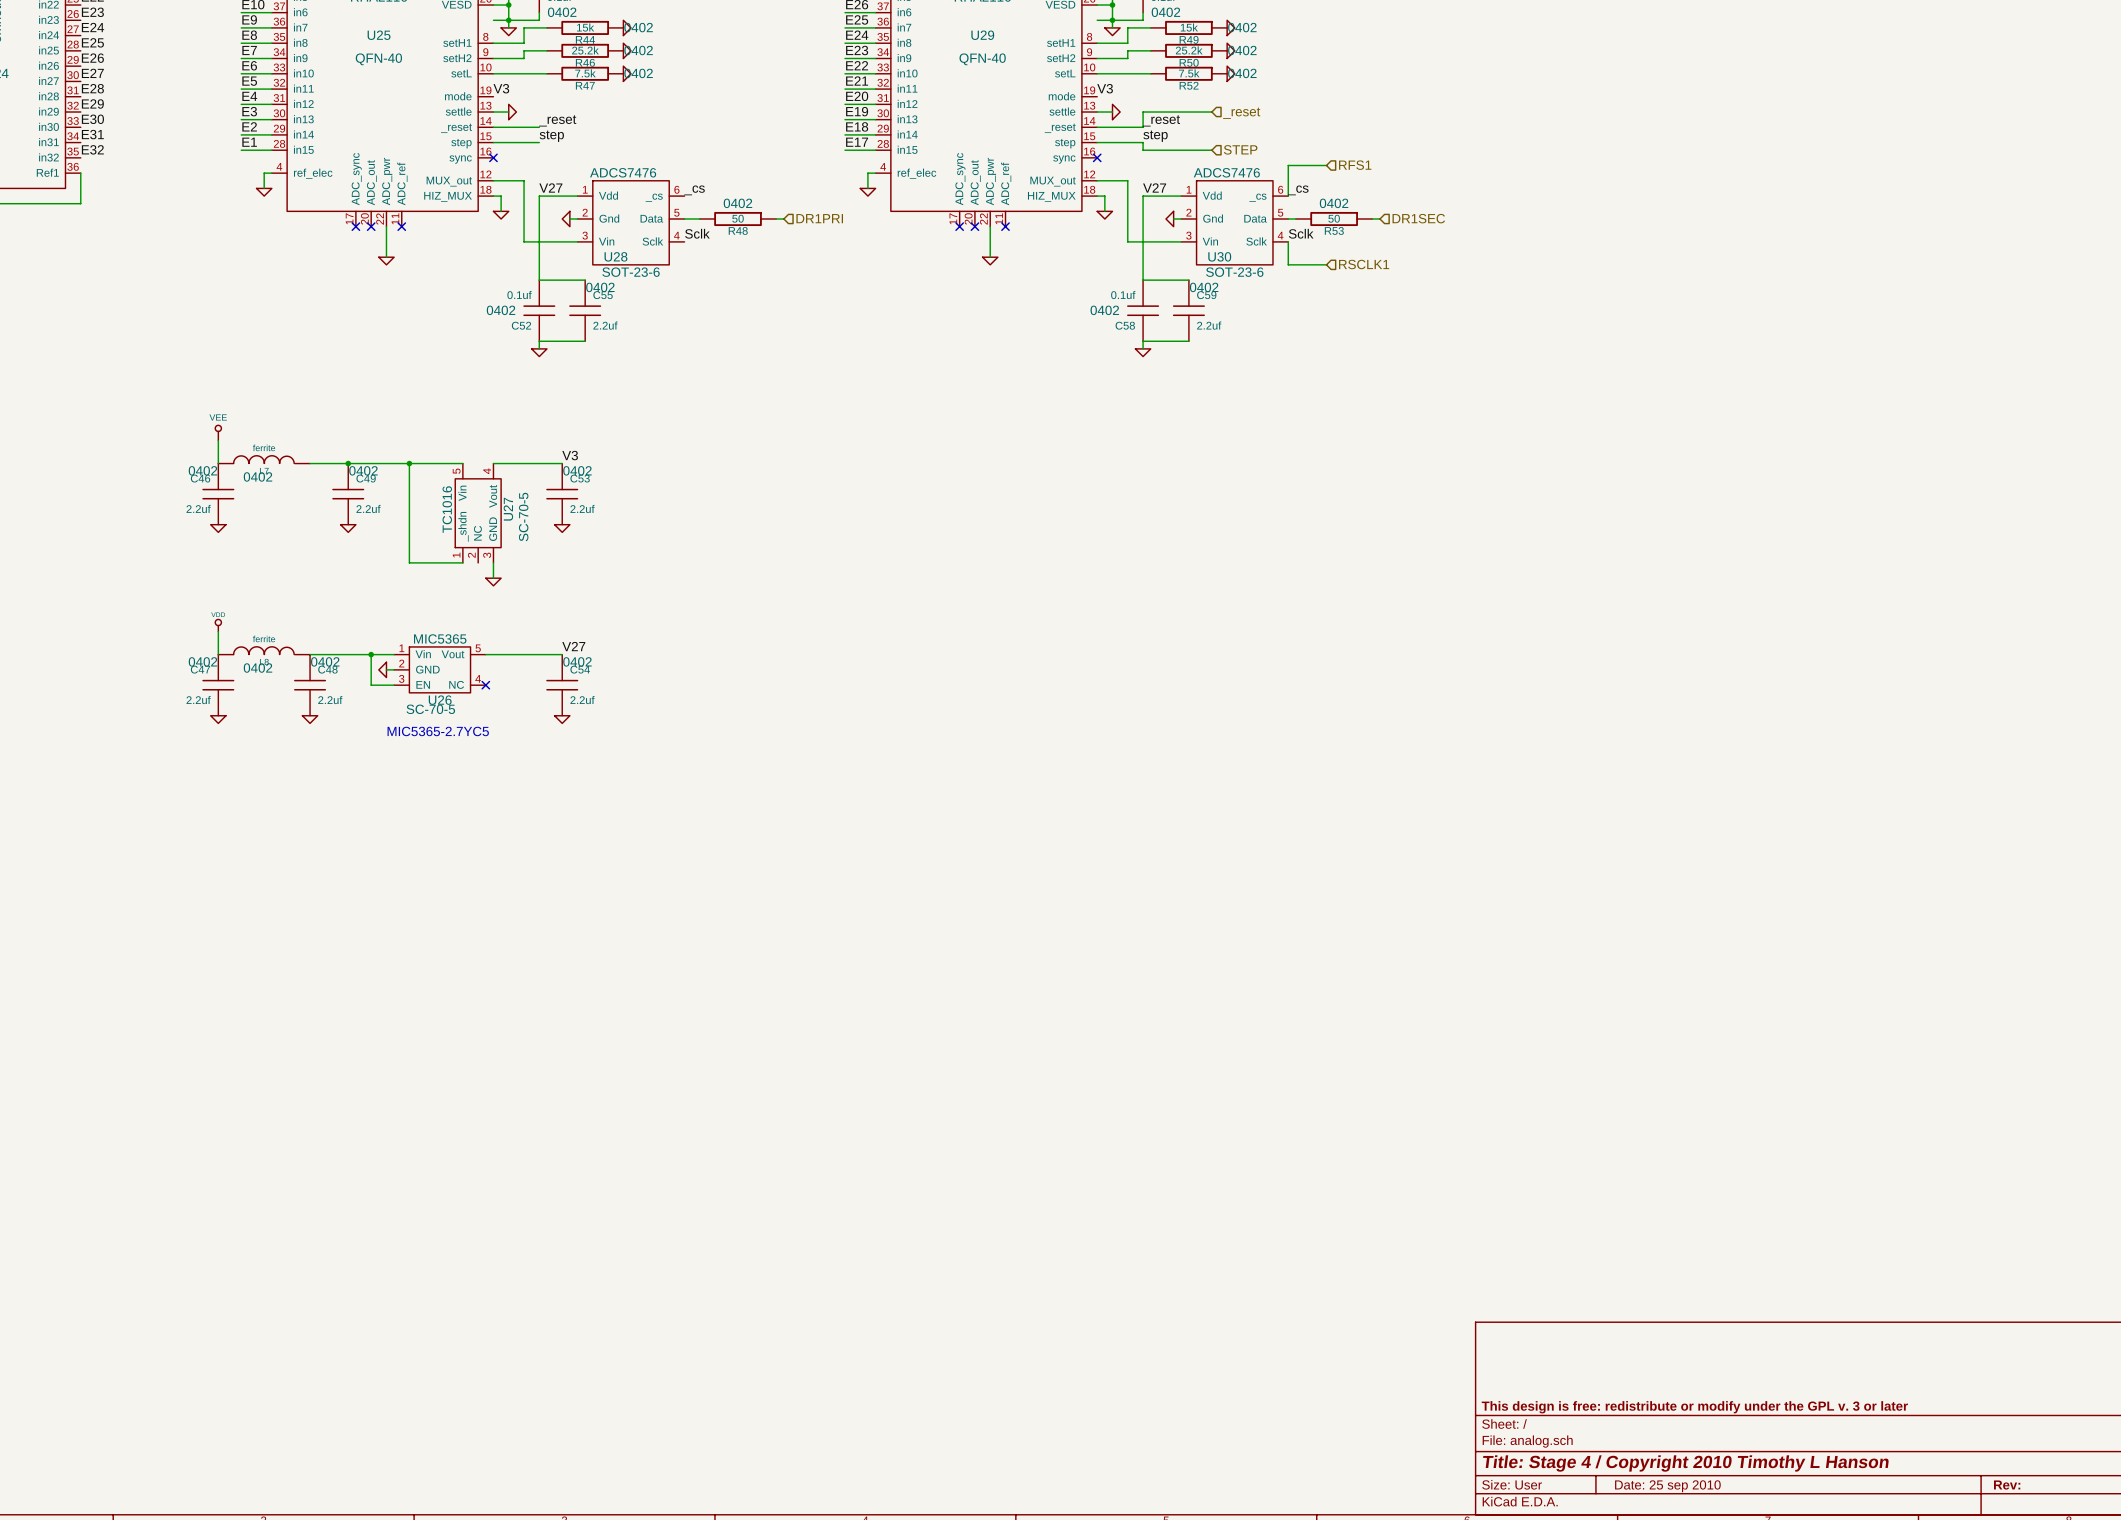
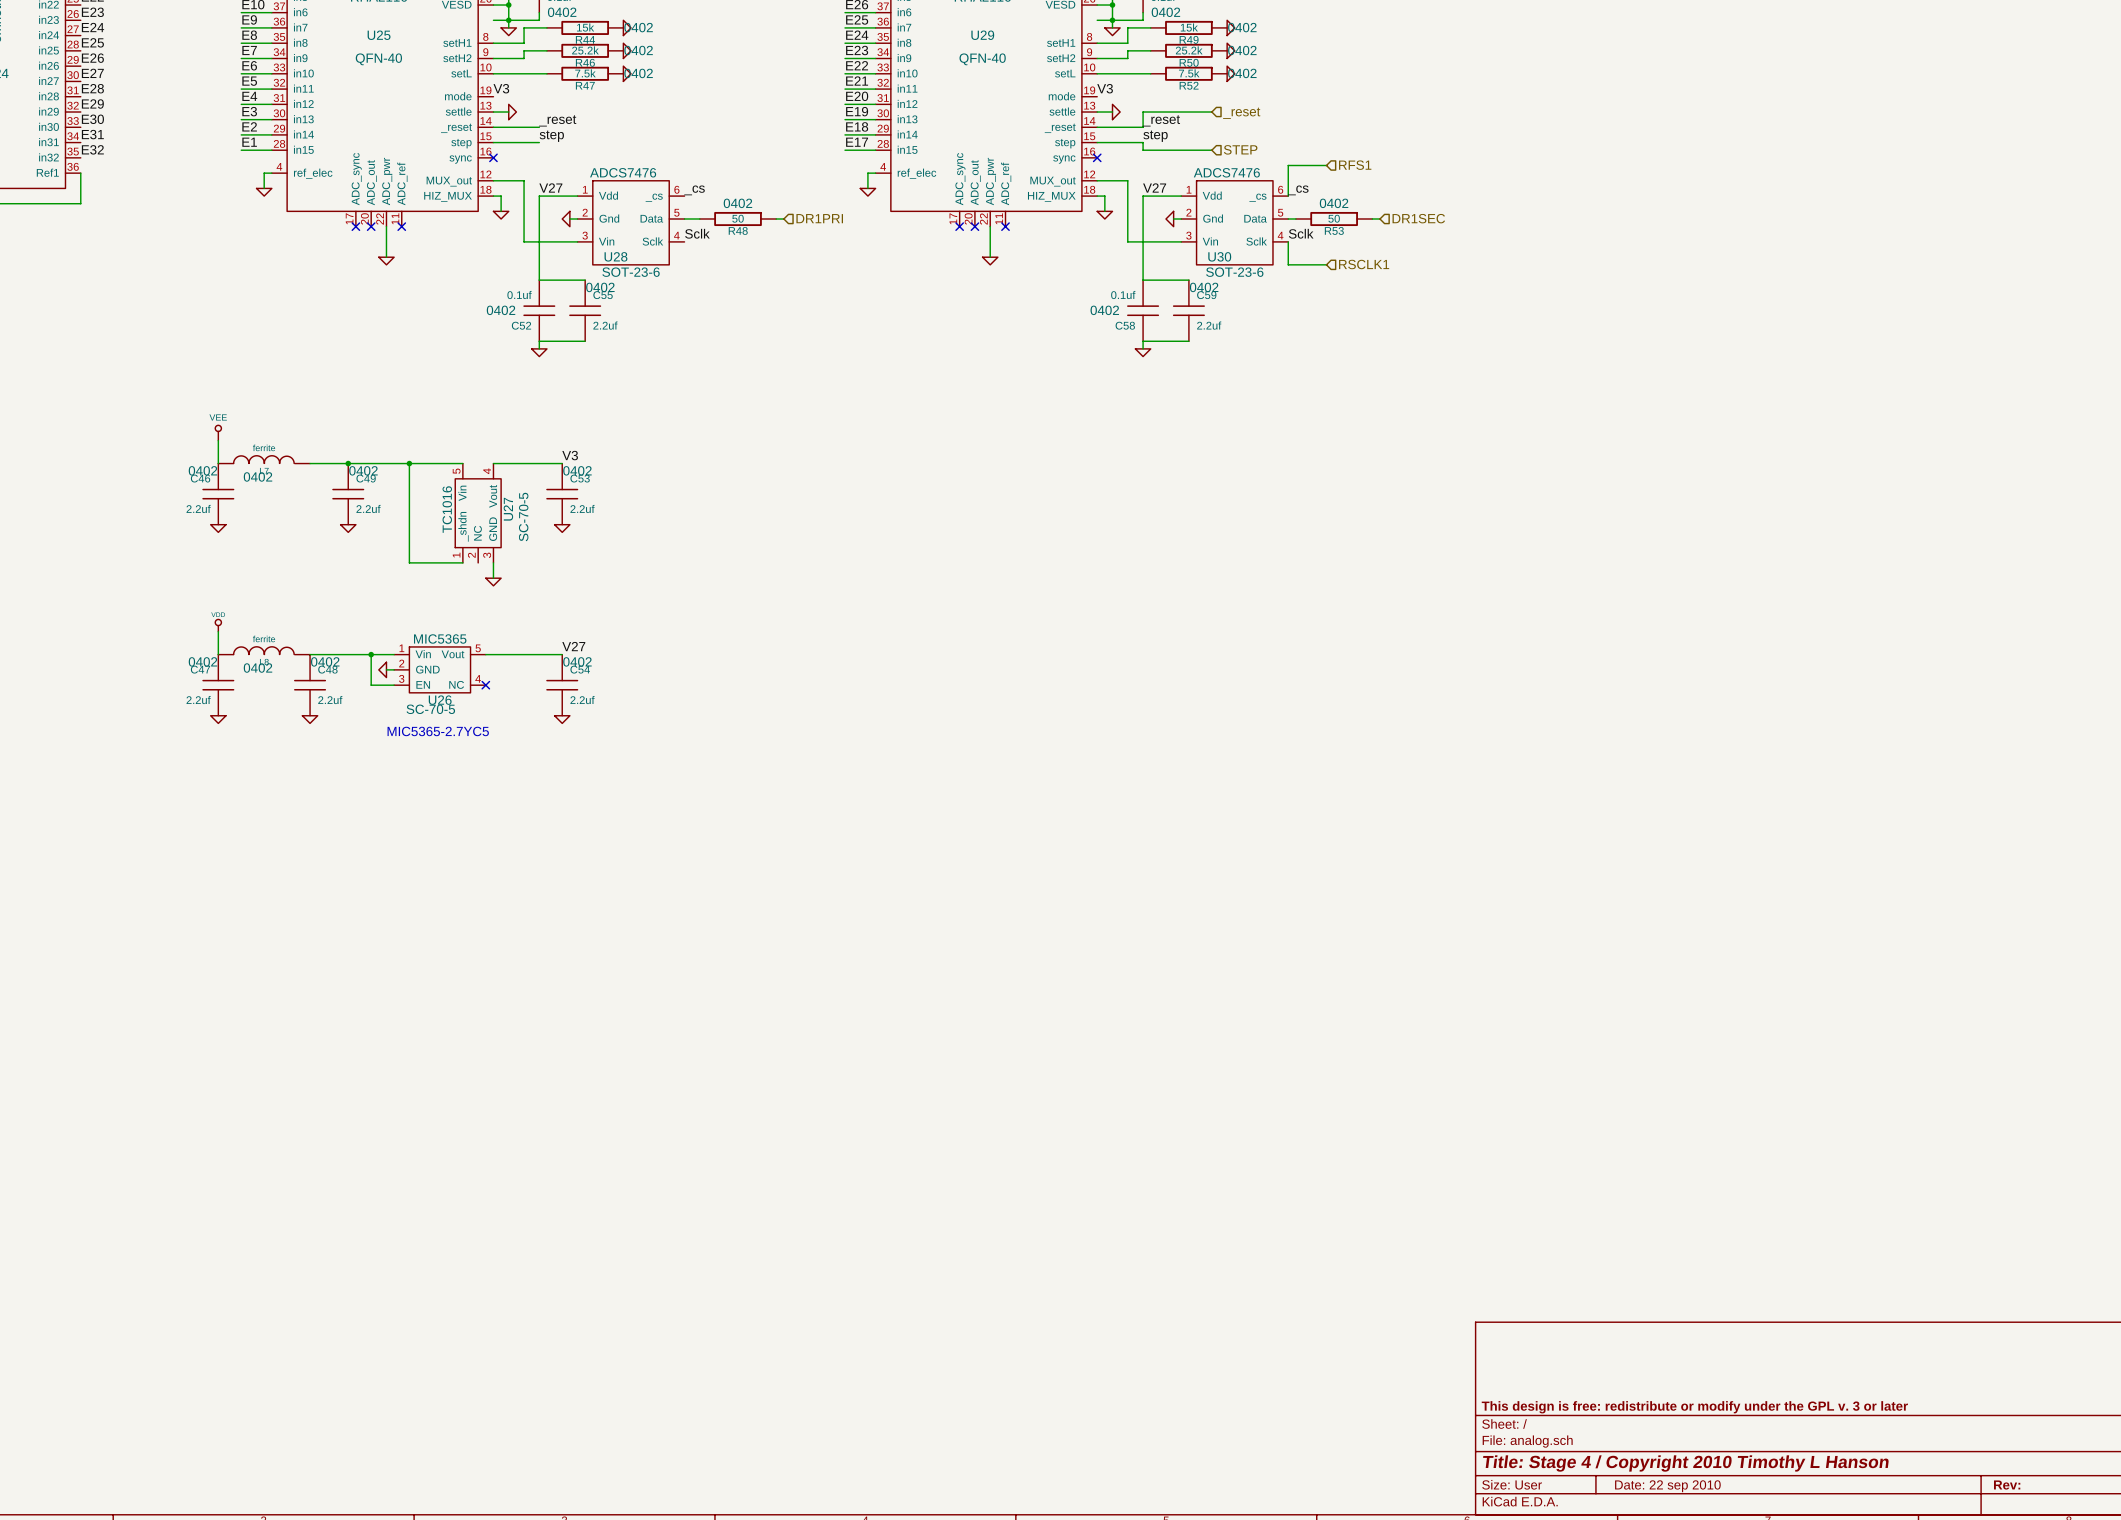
title block: Date: 25 sep 2010 (1667, 1486) -> Date: 22 sep 2010 (1667, 1486)

